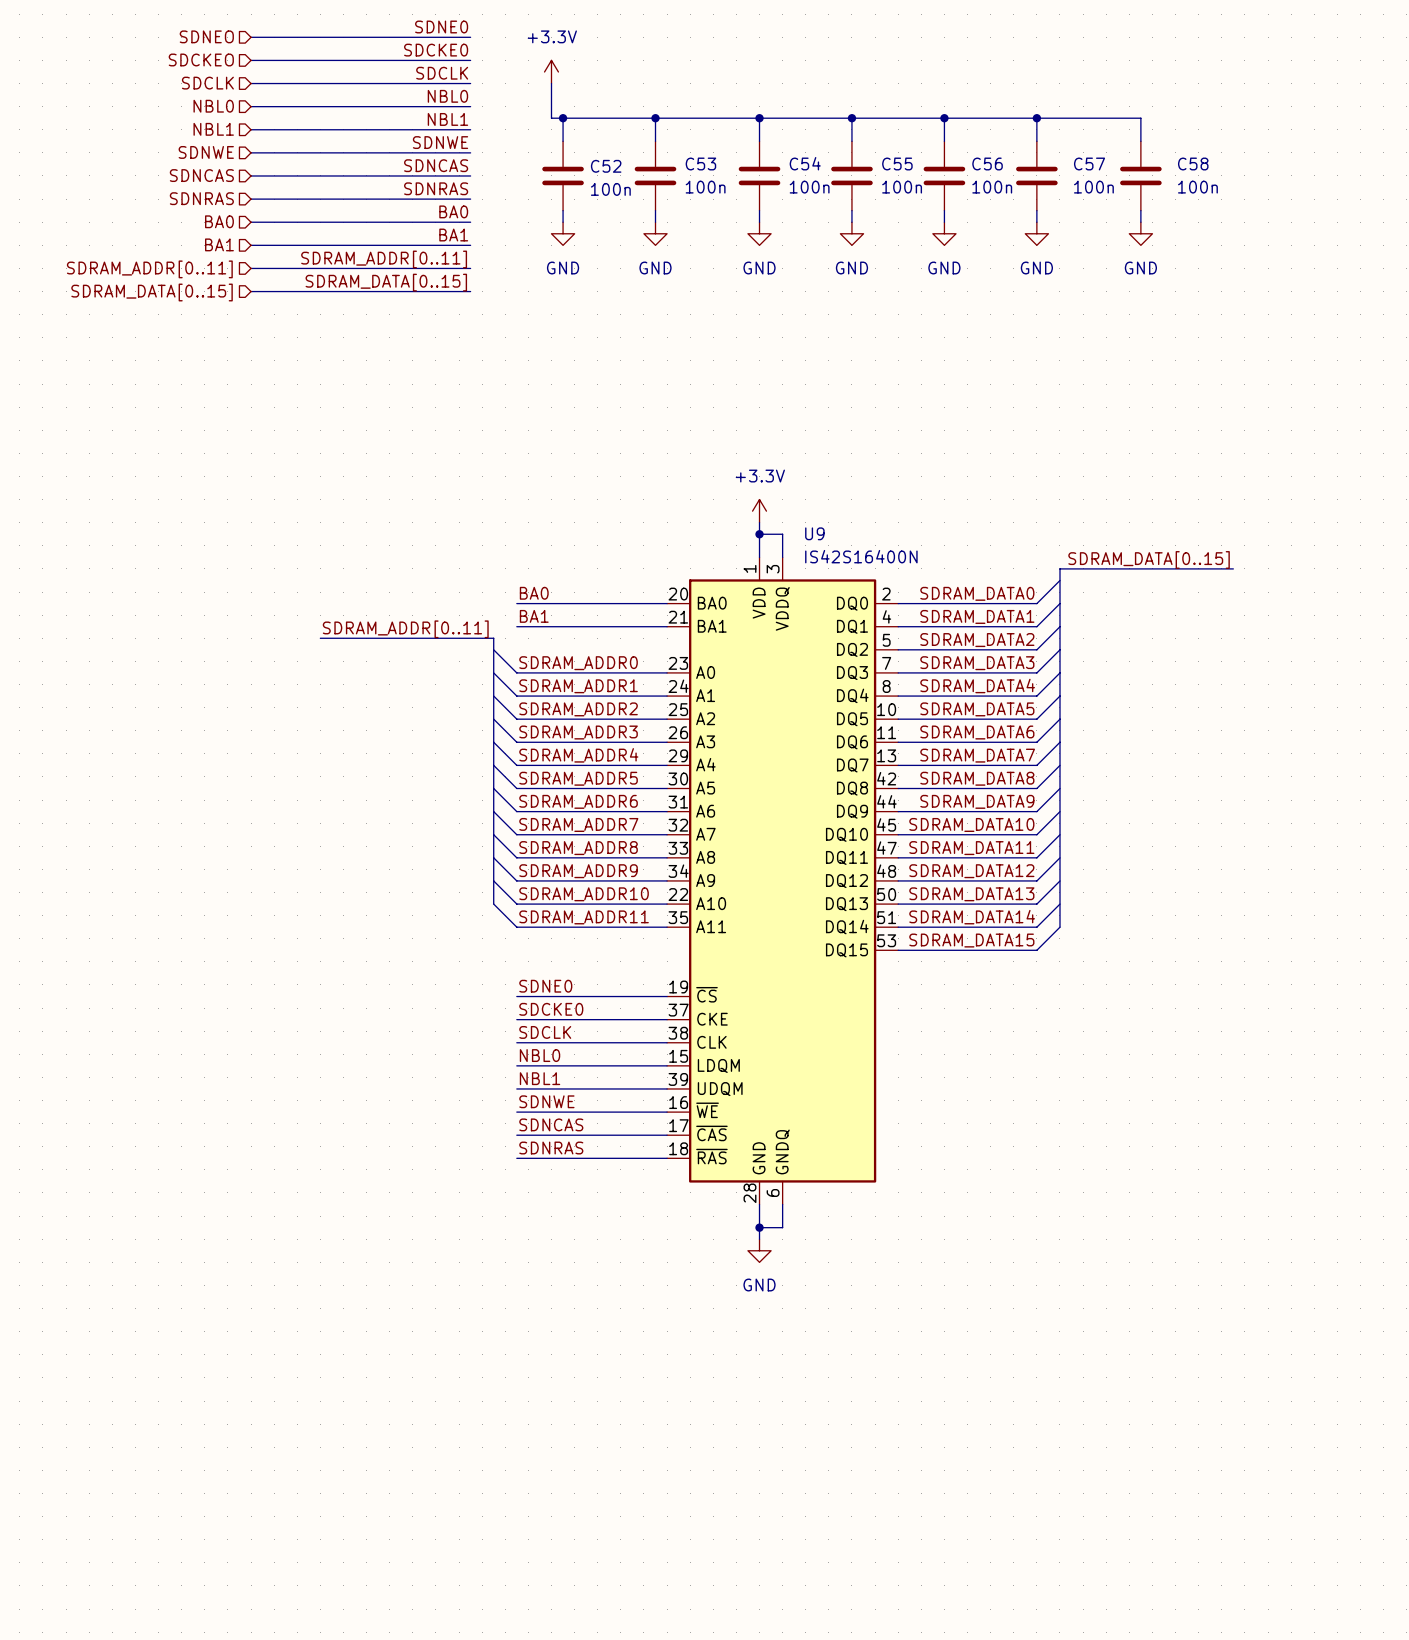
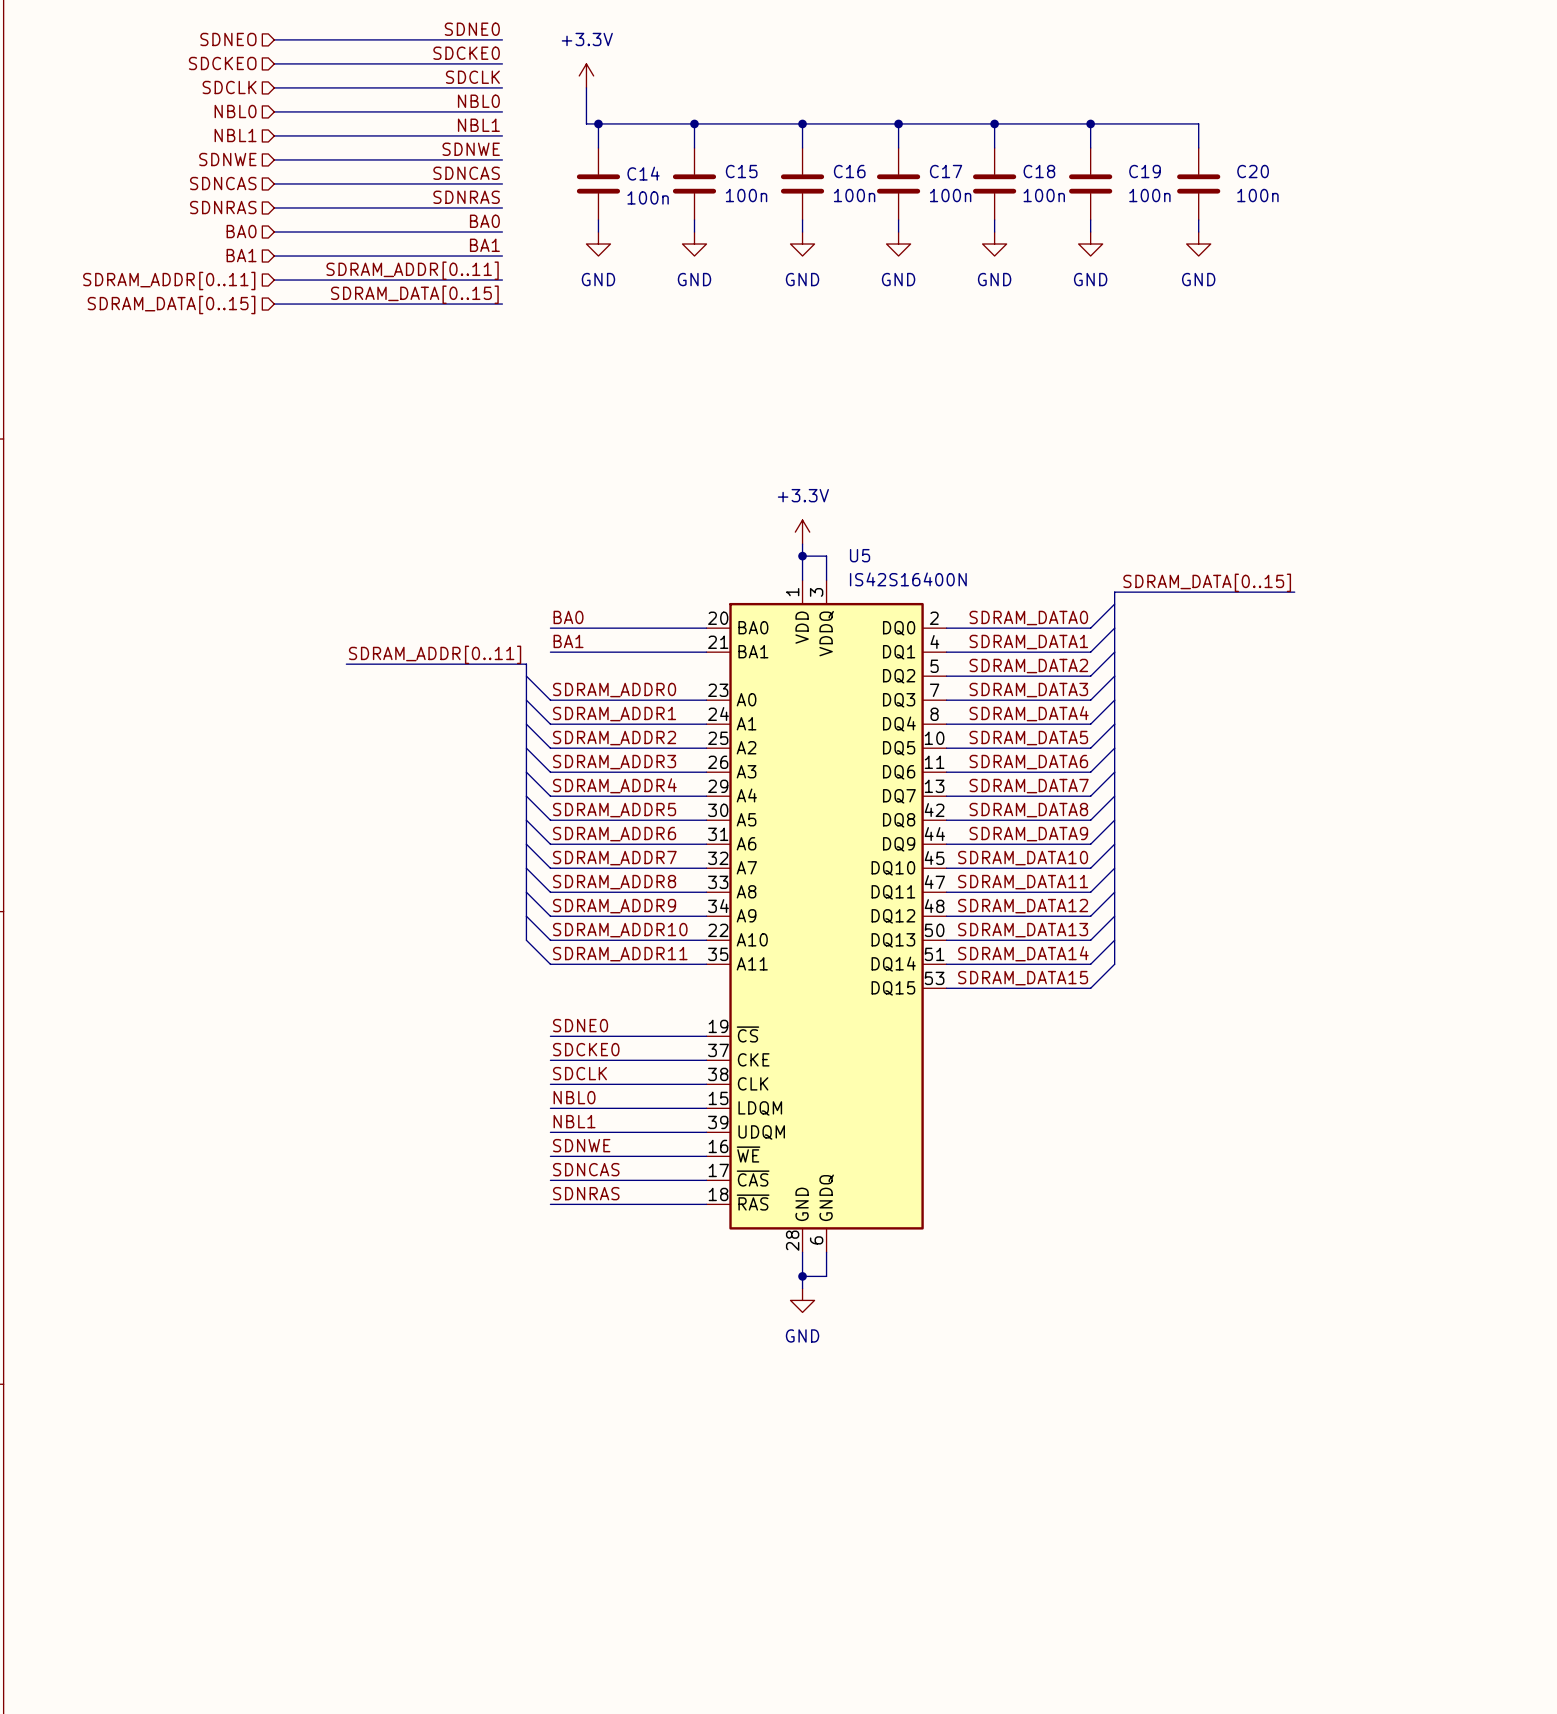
C54 name: C54 (805, 163) -> C16 (849, 171)
C53 name: C53 (700, 164) -> C15 (741, 171)
C55 name: C55 (897, 164) -> C17 (946, 171)
C56 name: C56 (987, 164) -> C18 (1039, 171)
C57 name: C57 (1089, 164) -> C19 (1145, 171)
C58 name: C58 (1193, 164) -> C20 (1253, 171)
C52 name: C52 (606, 166) -> C14 (643, 173)
U9 name: U9 (814, 533) -> U5 (860, 555)

